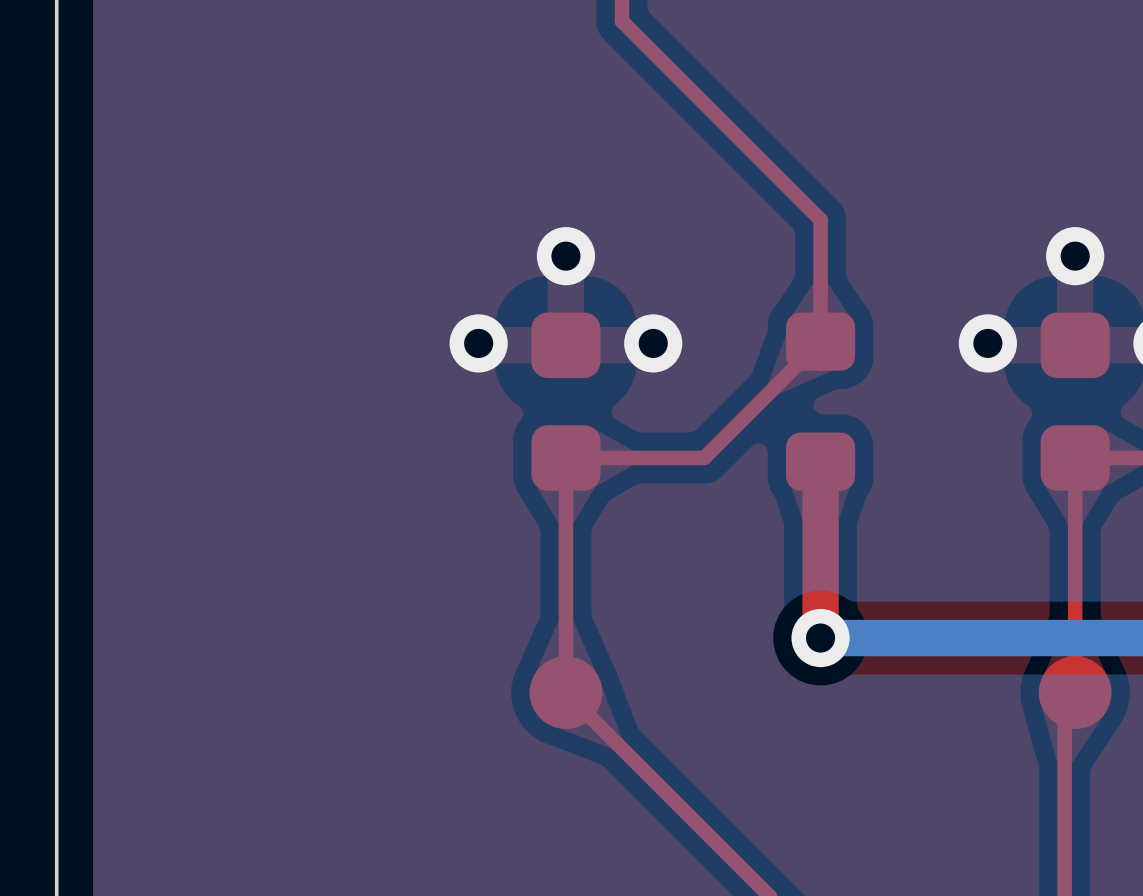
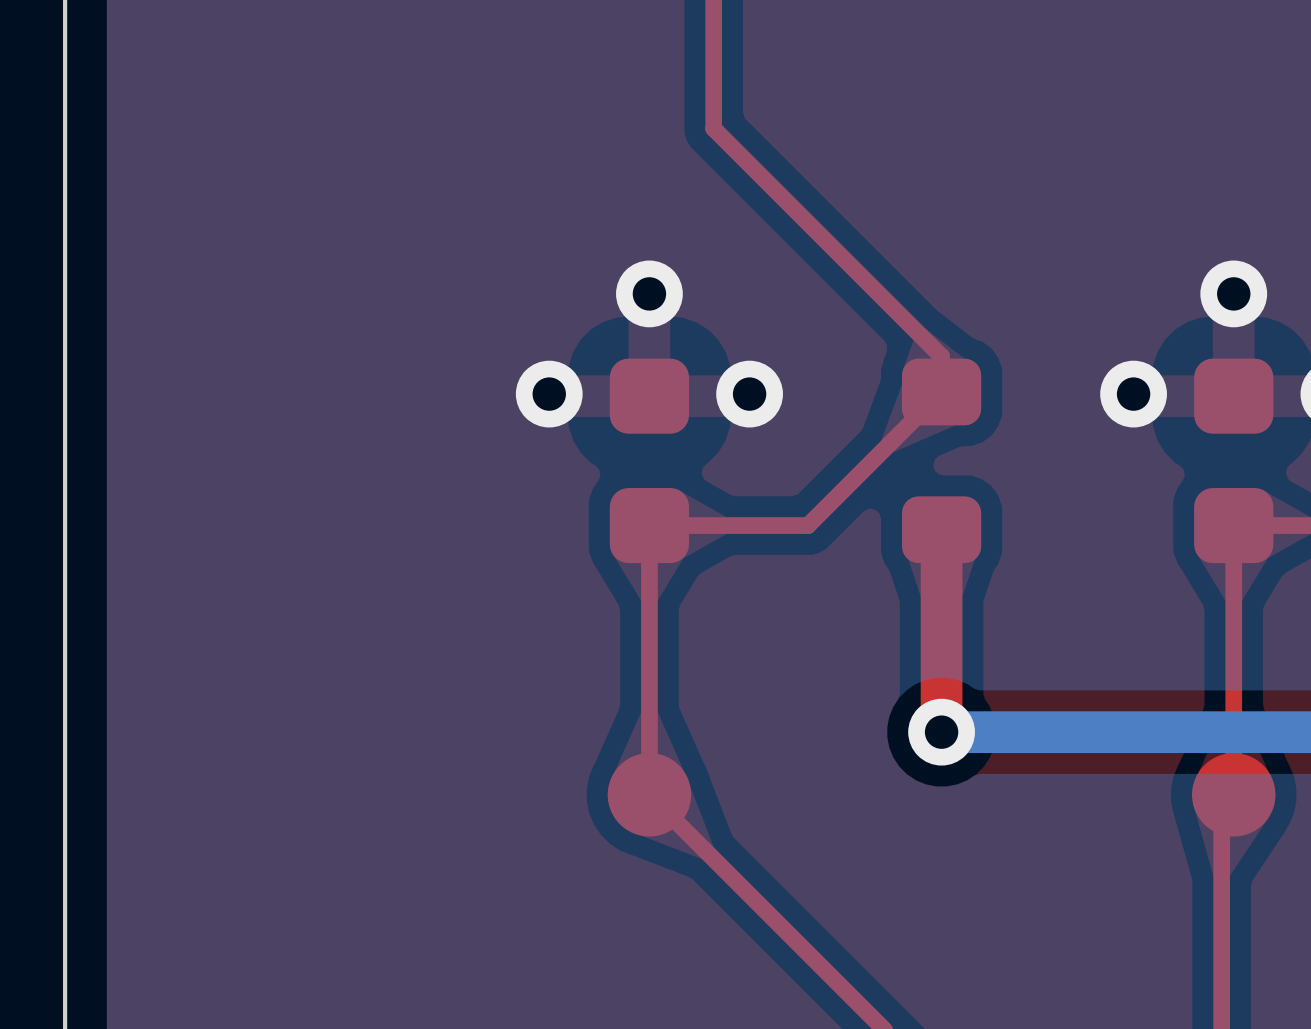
top track: (621, 21) (820, 219) (820, 310) -> (713, 24) (713, 128) (941, 356)

